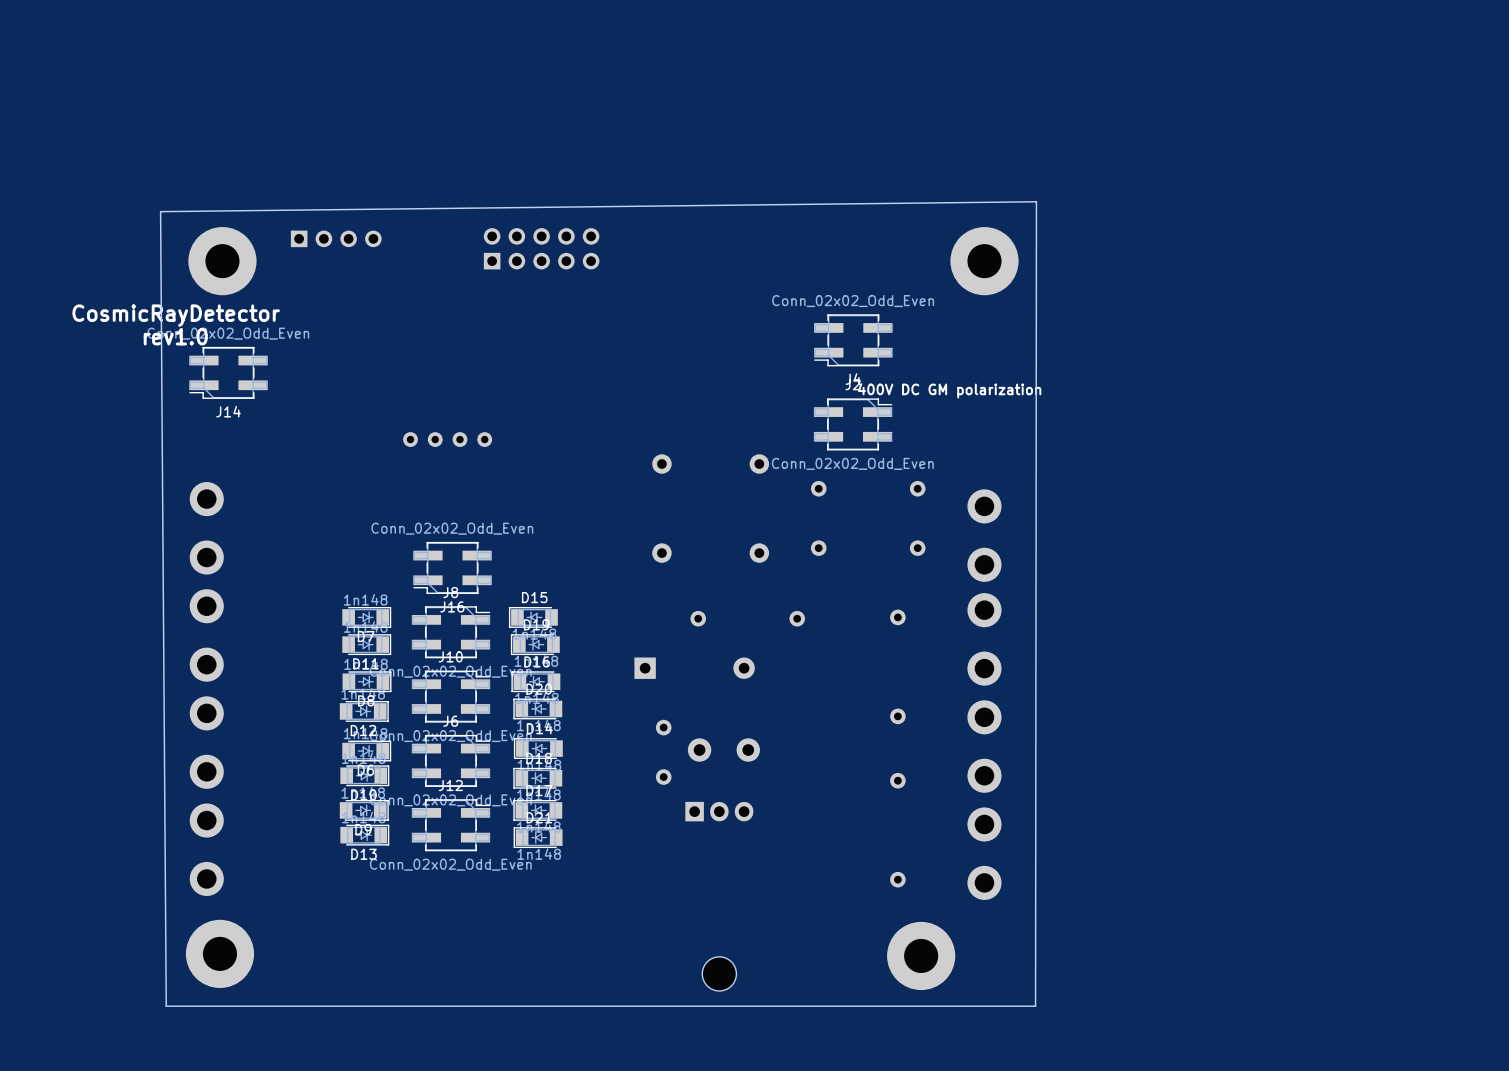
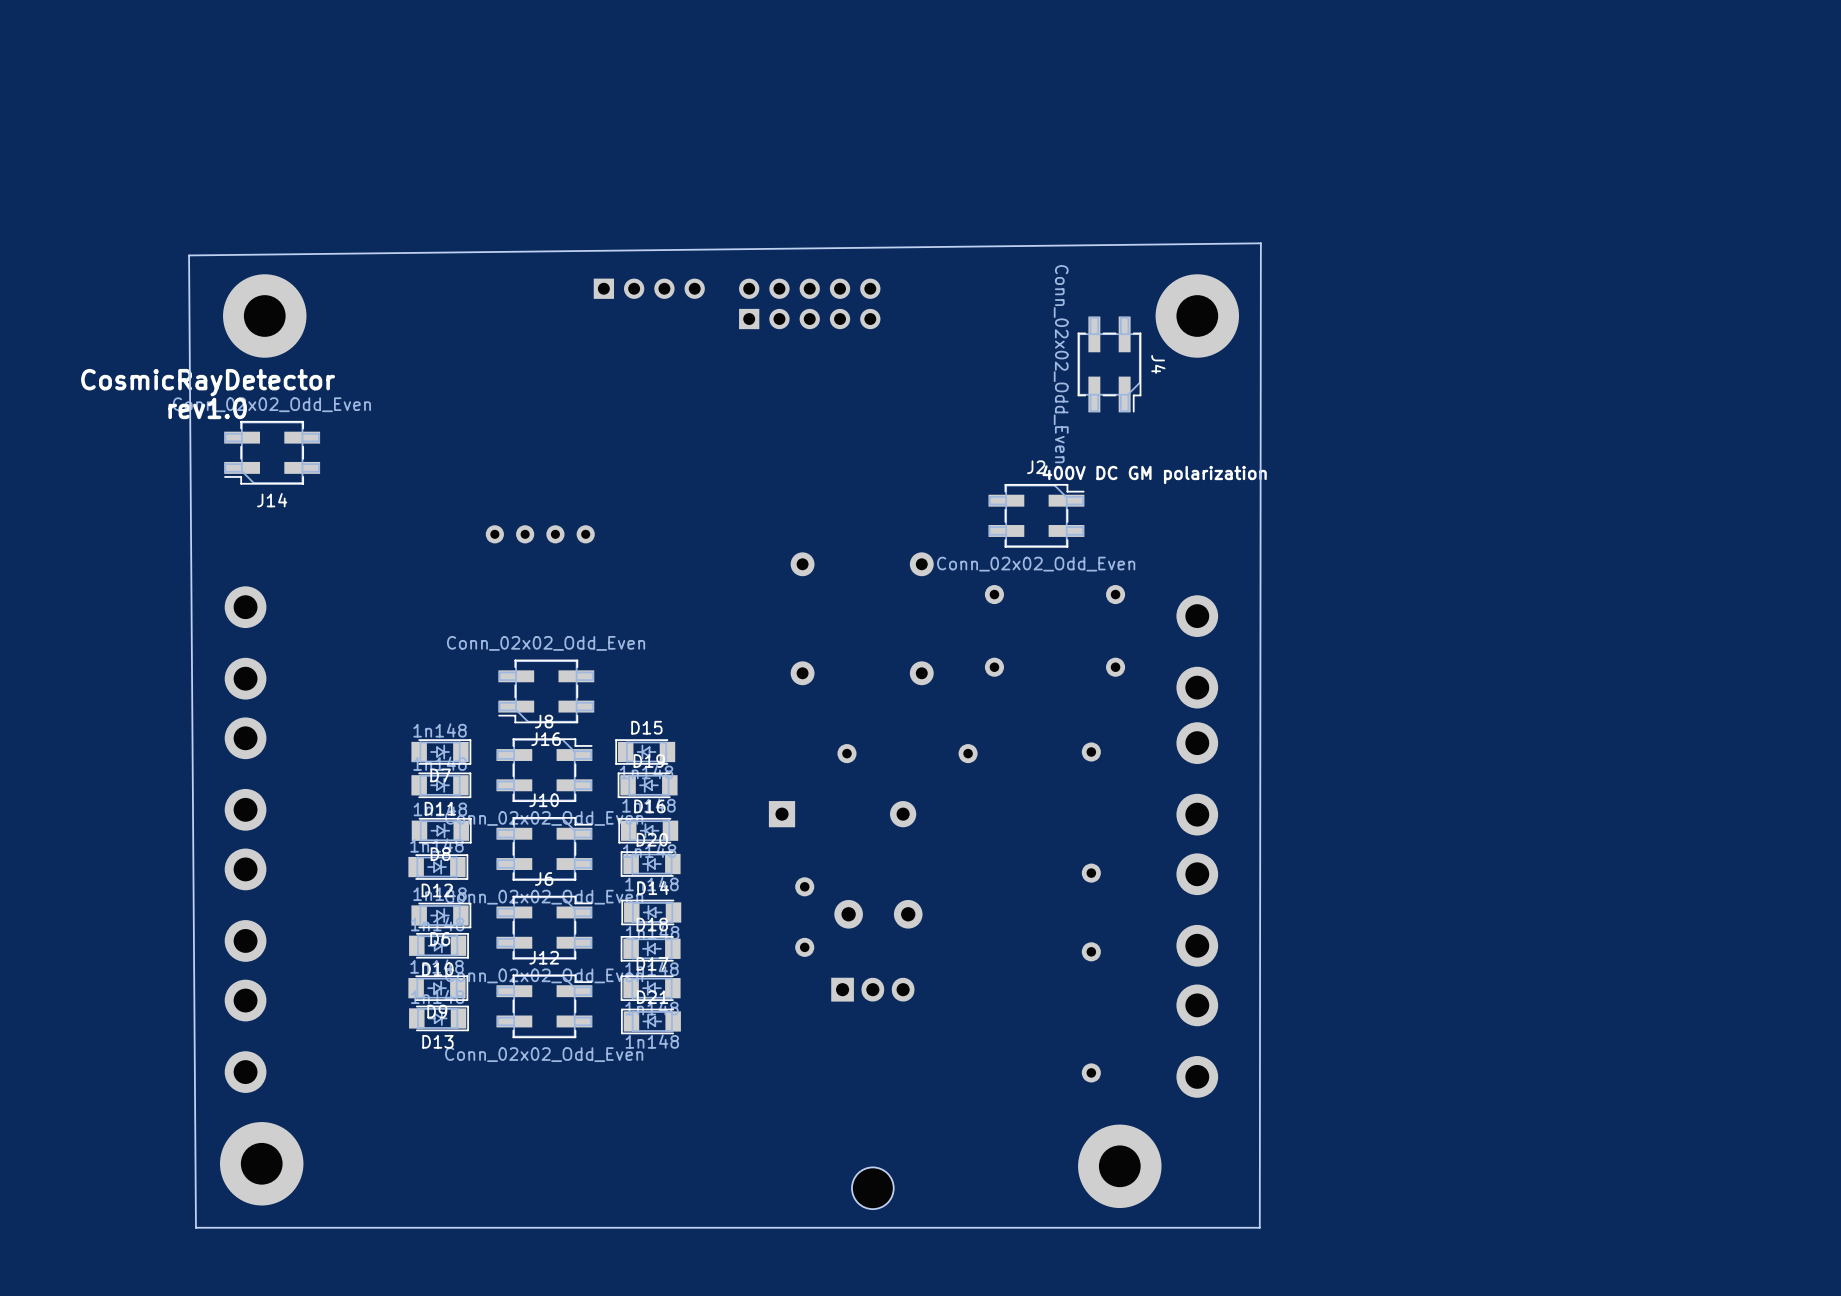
part position: (336, 238) -> (649, 288)
part position: (541, 248) -> (809, 303)
J4 rotation: 0° (853, 340) -> 90° counterclockwise (1109, 364)
J4 position: (853, 340) -> (1109, 364)

